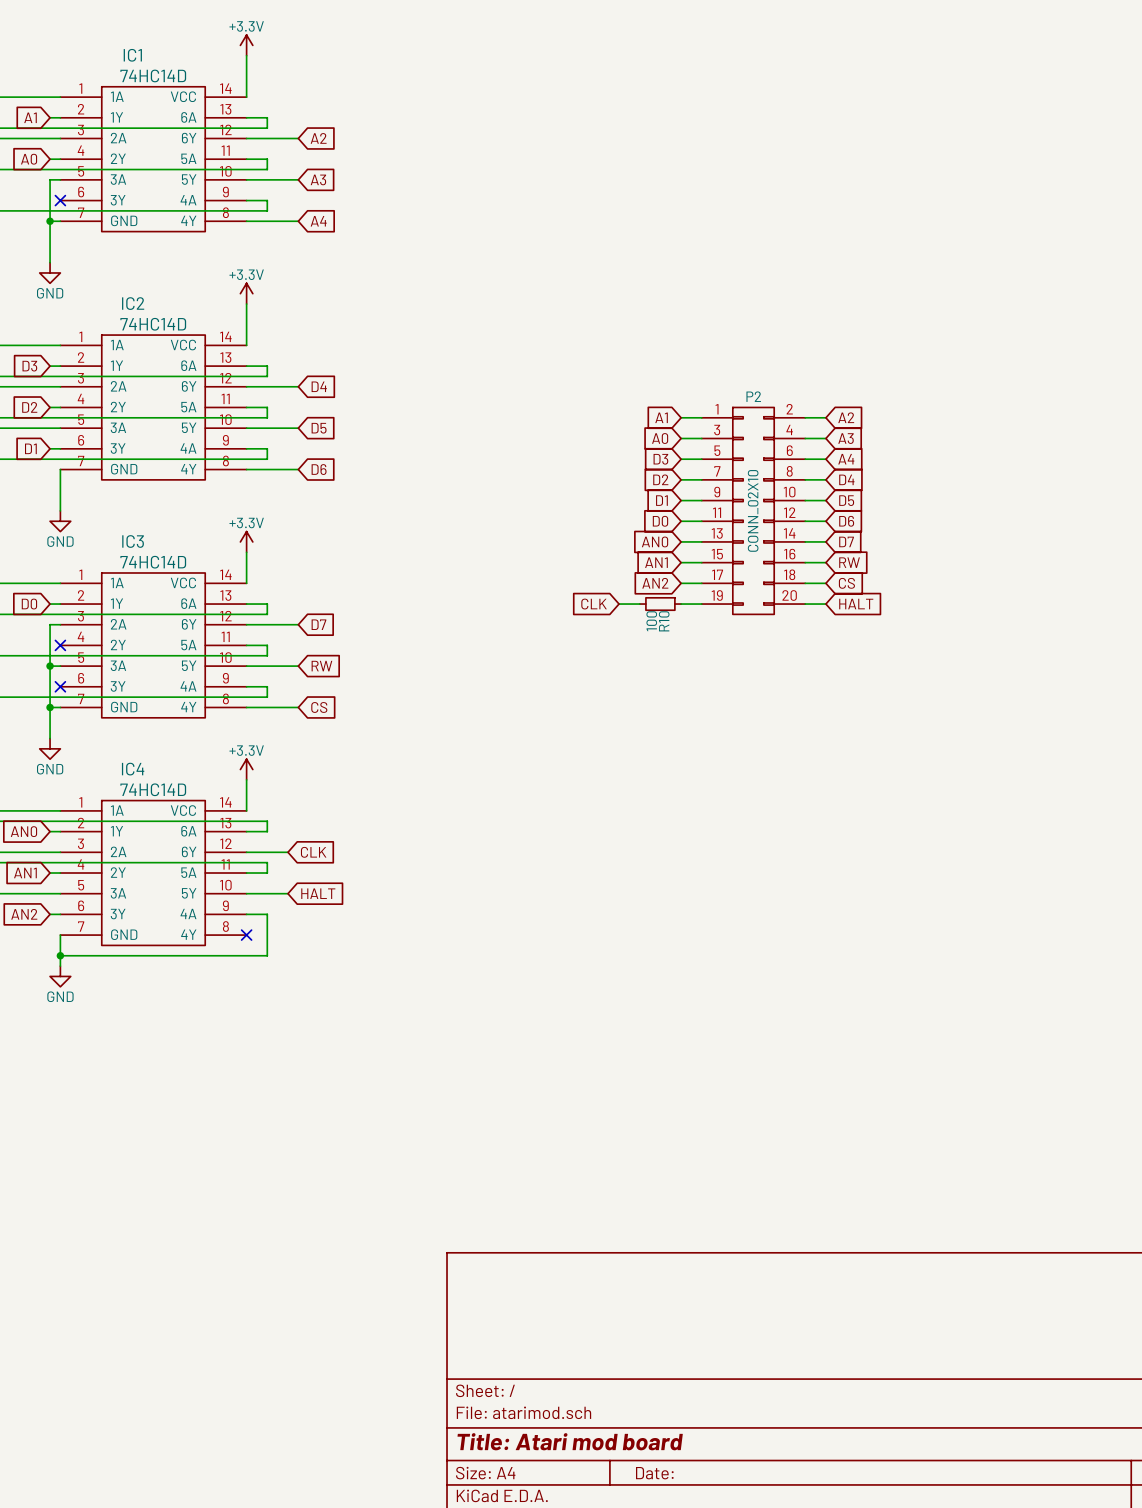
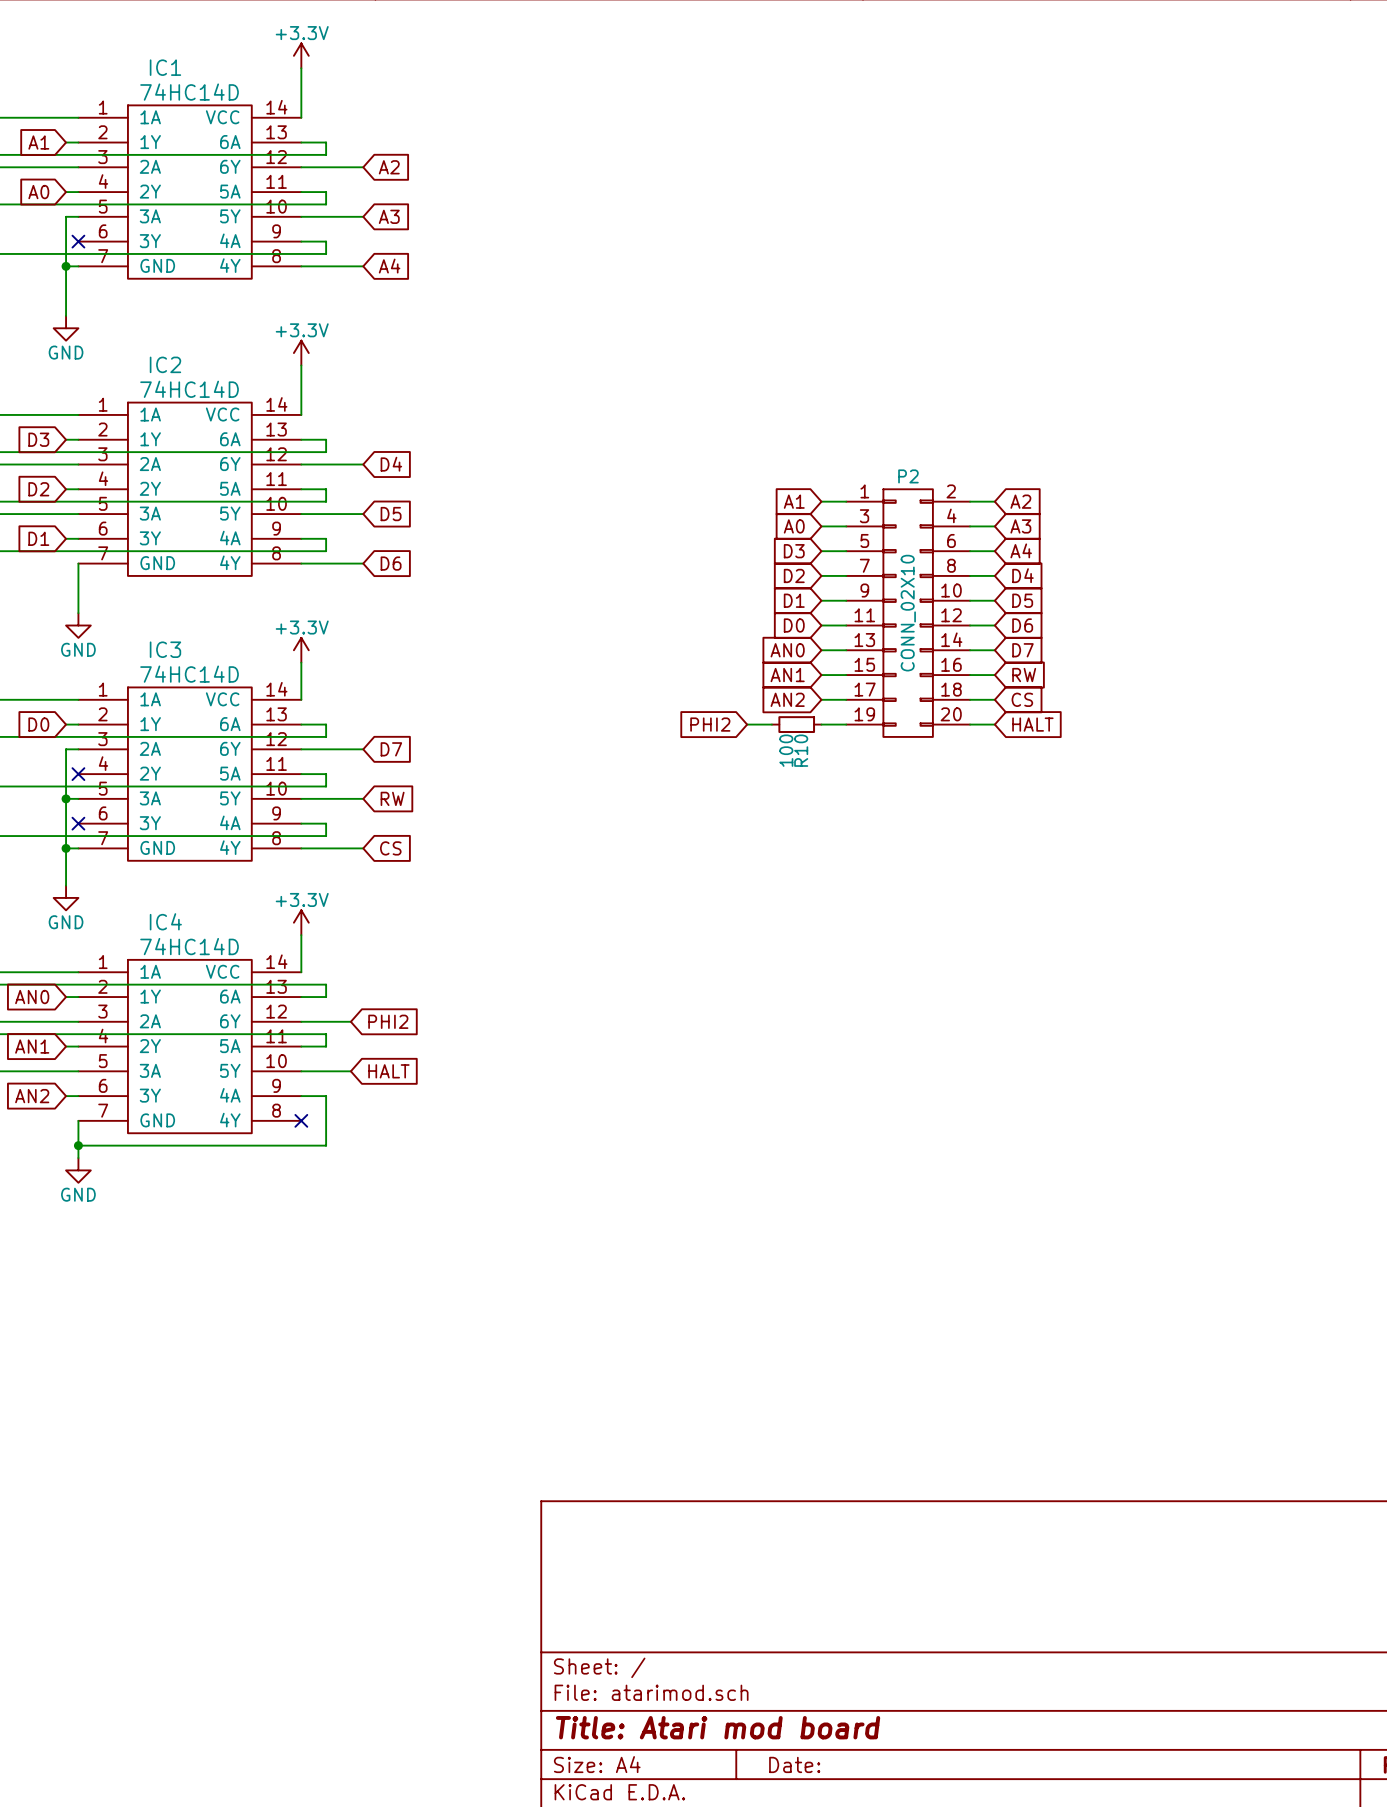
global label: CLK (594, 604) -> PHI2 (710, 724)
global label: CLK (313, 852) -> PHI2 (388, 1021)

